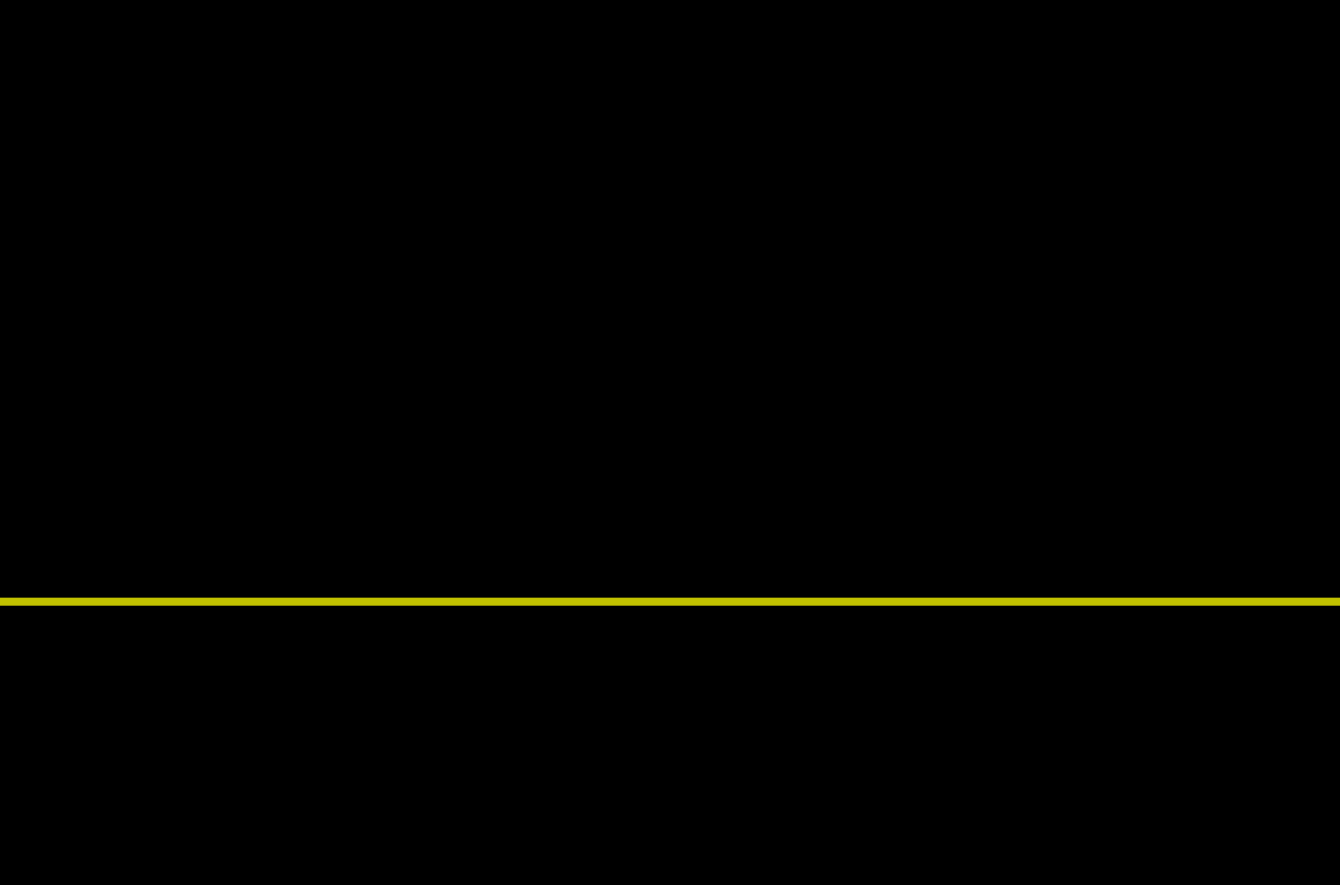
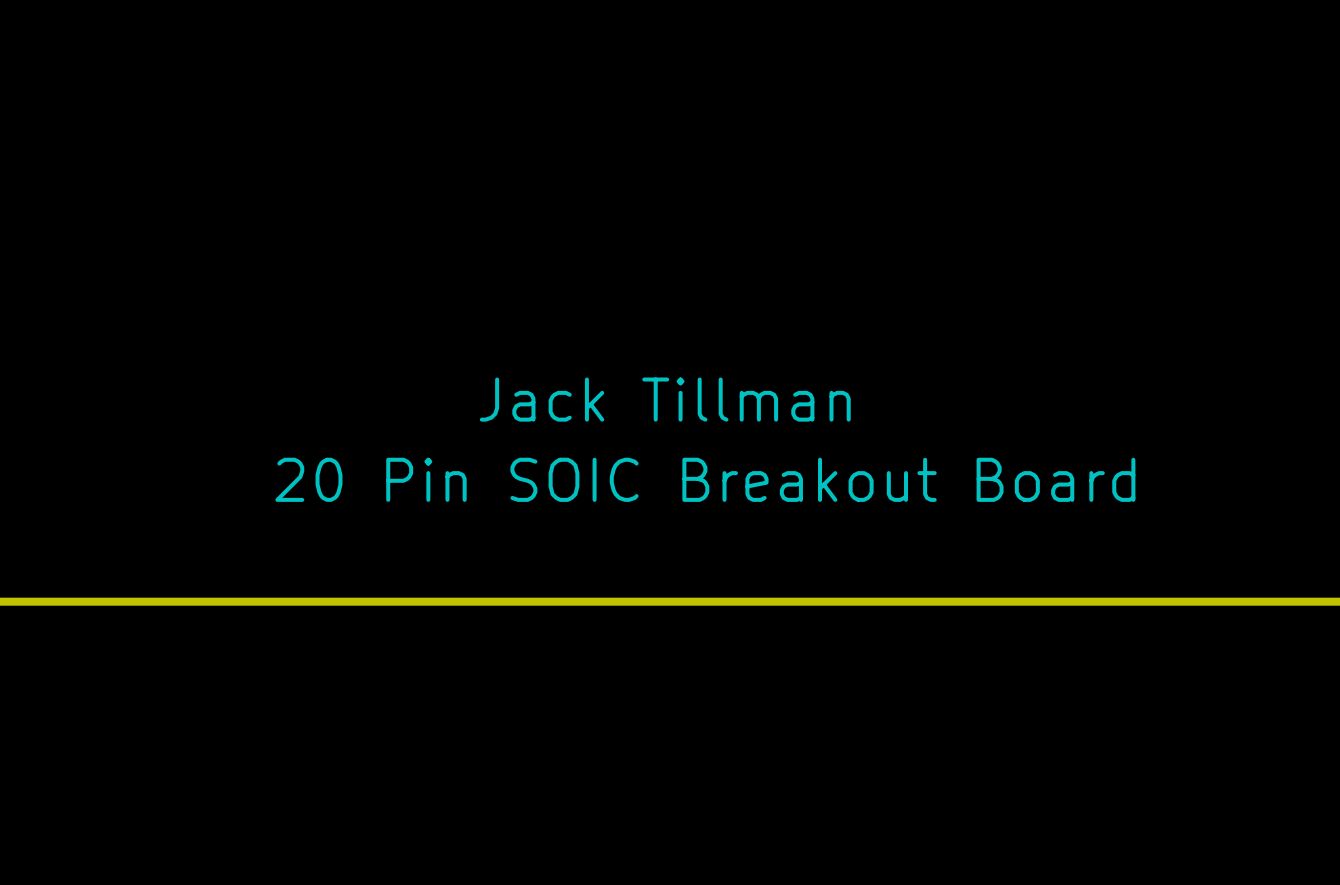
text: none -> Jack Tillman (665, 399)
text: none -> 20 Pin SOIC Breakout Board (705, 479)

